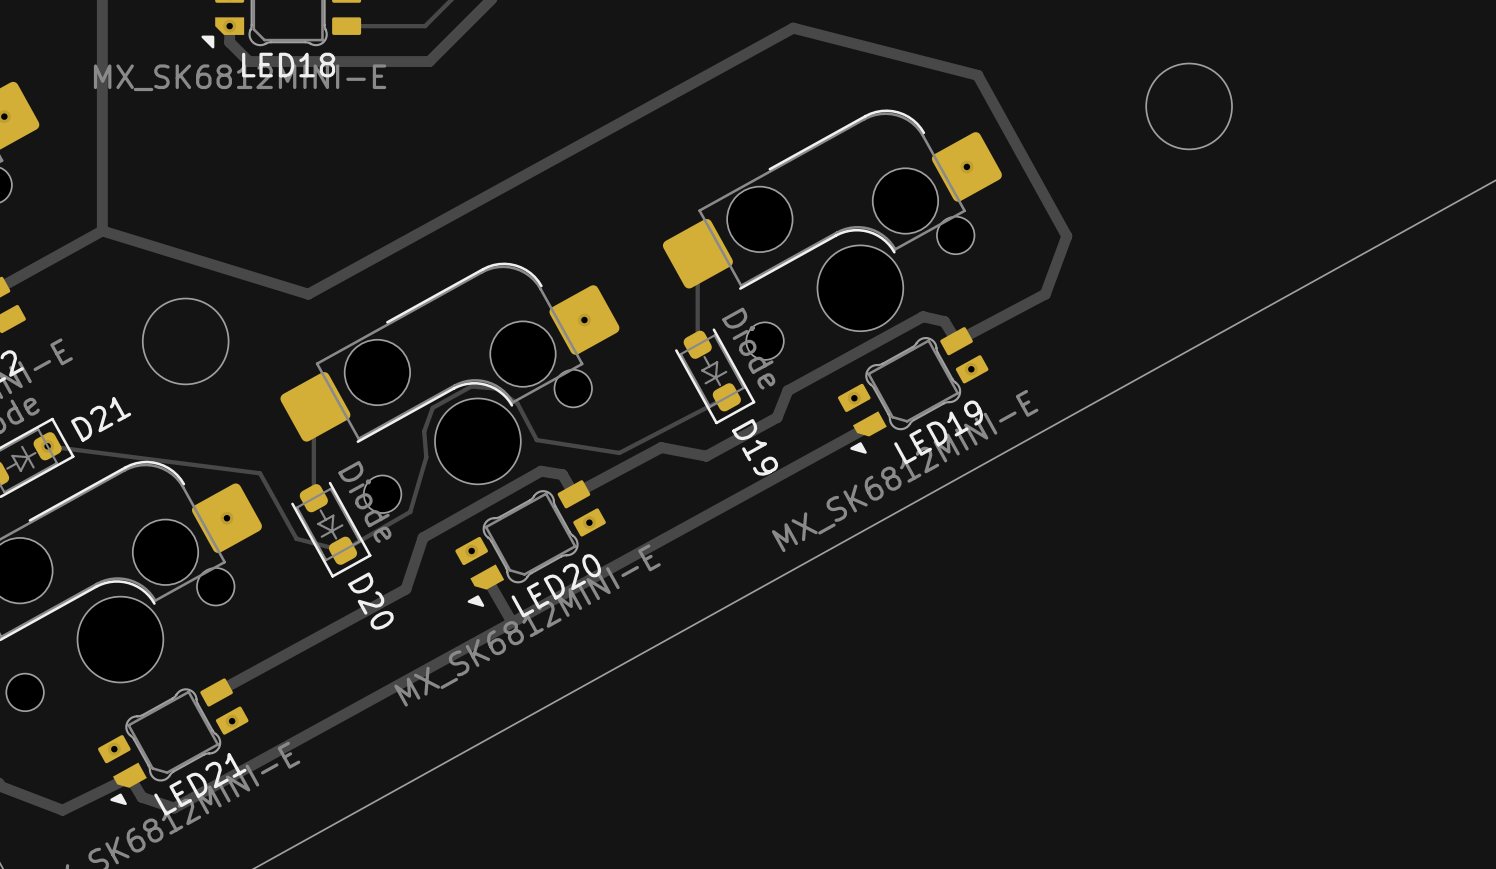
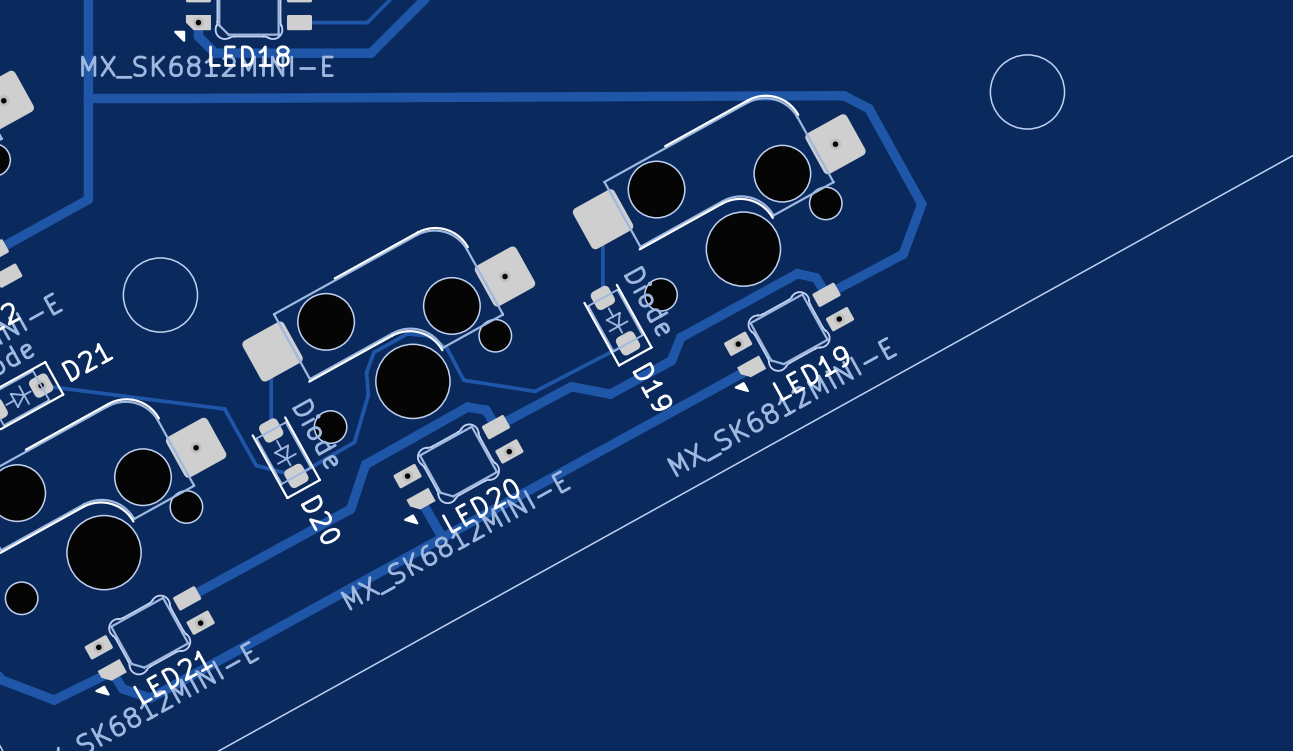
track: (1005, 125) (977, 75) (793, 28) (308, 294) (102, 230) -> (868, 108) (843, 95) (88, 98)

